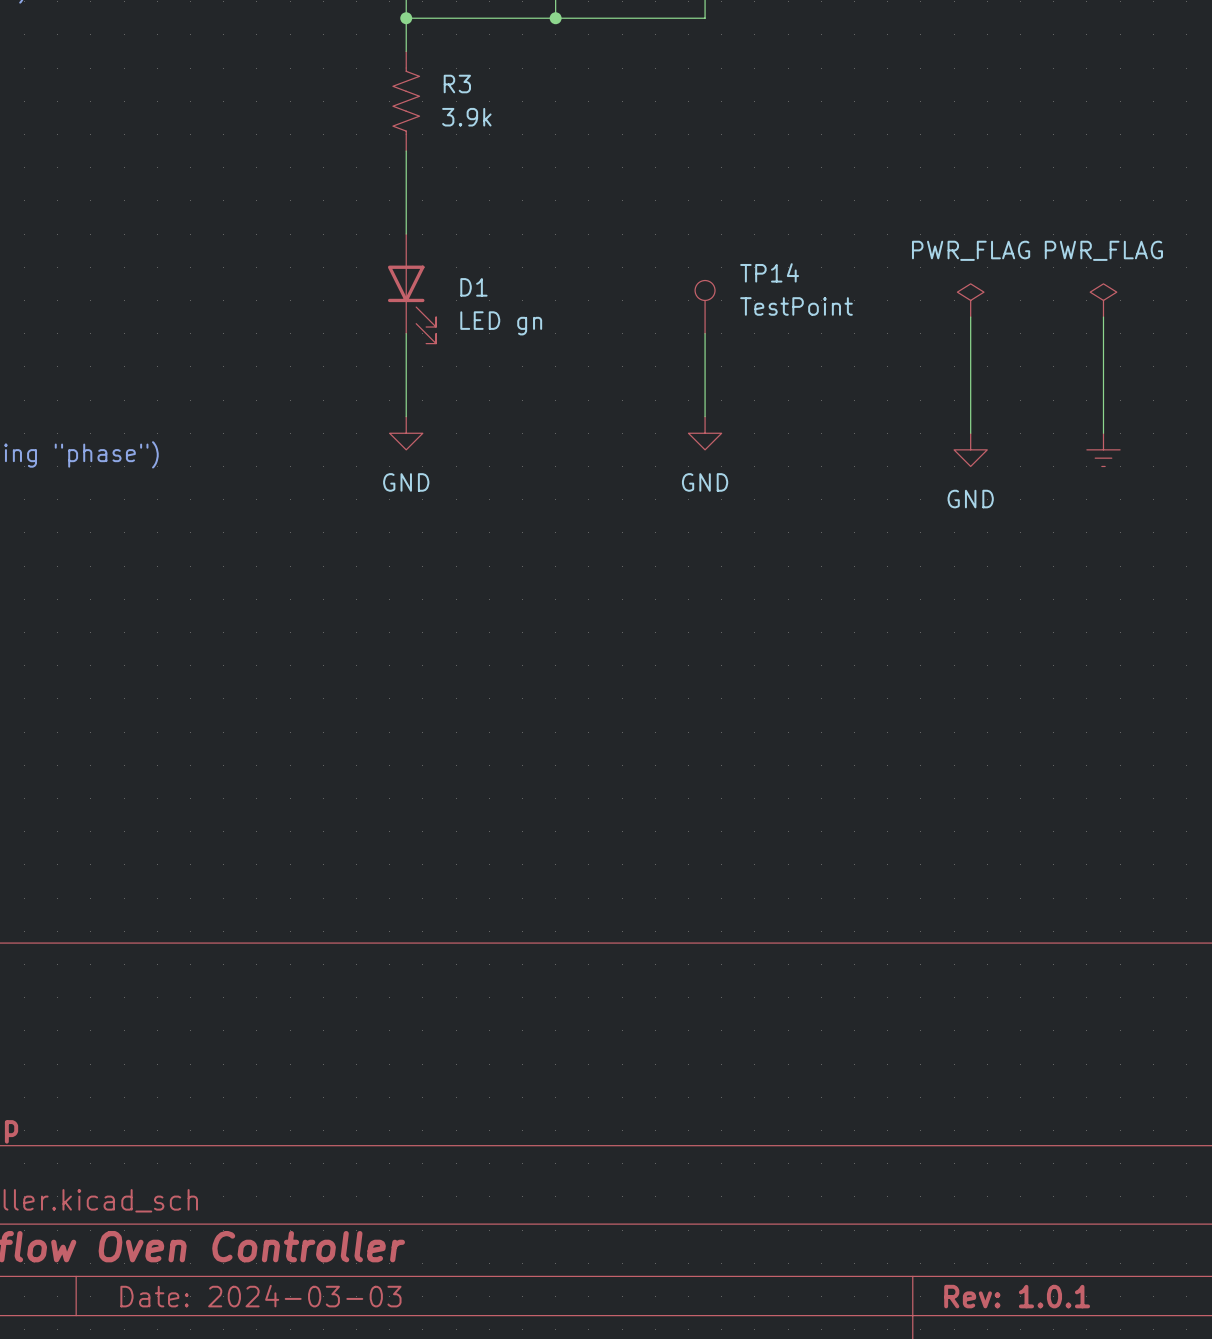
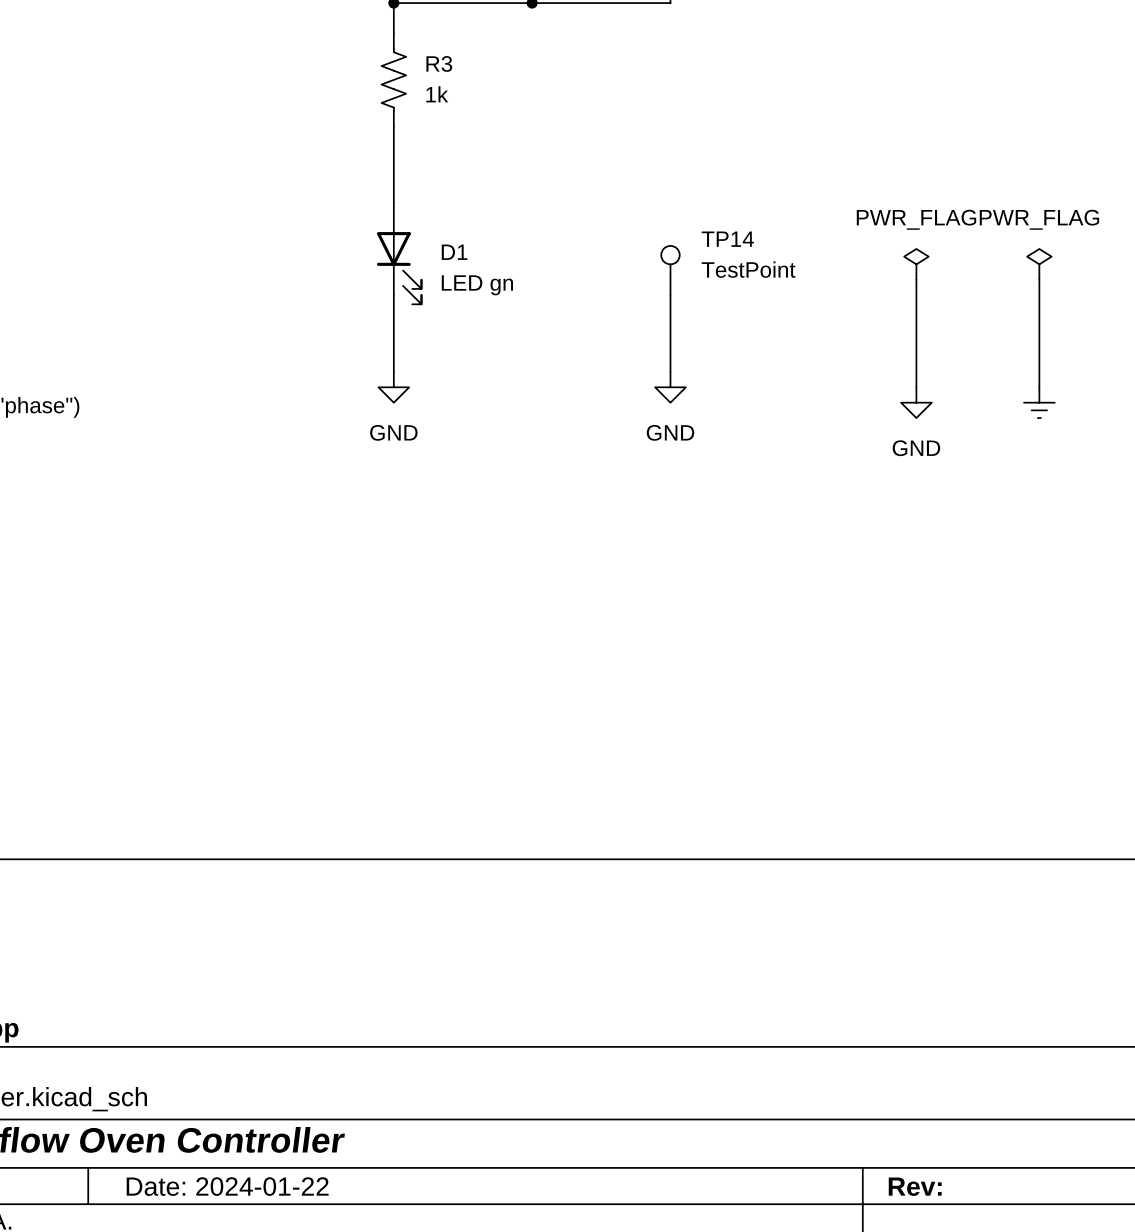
R3 value: 3.9k (466, 117) -> 1k (437, 94)
title block: Date: 2024-03-03 (260, 1296) -> Date: 2024-01-22 (227, 1186)
title block: Rev: 1.0.1 (1017, 1296) -> Rev: (915, 1186)

